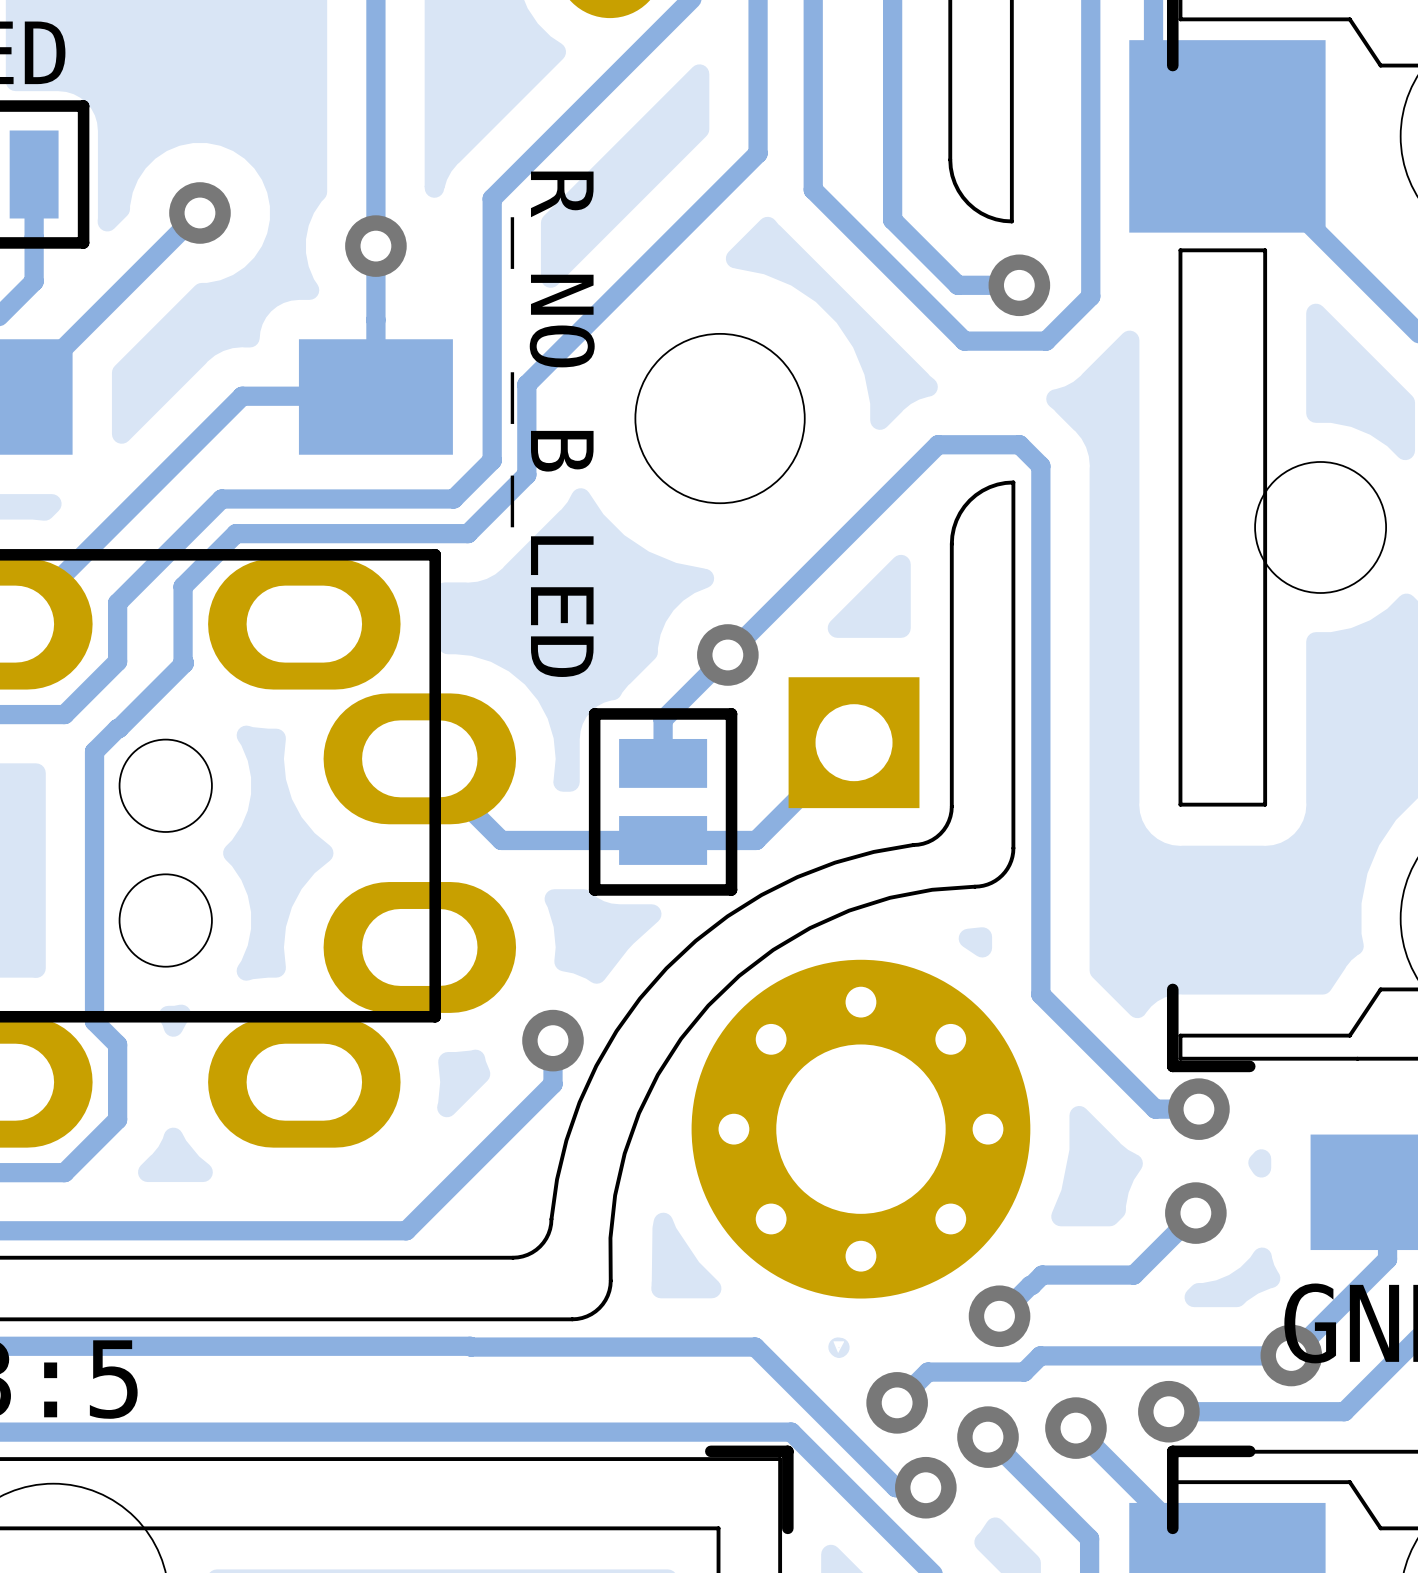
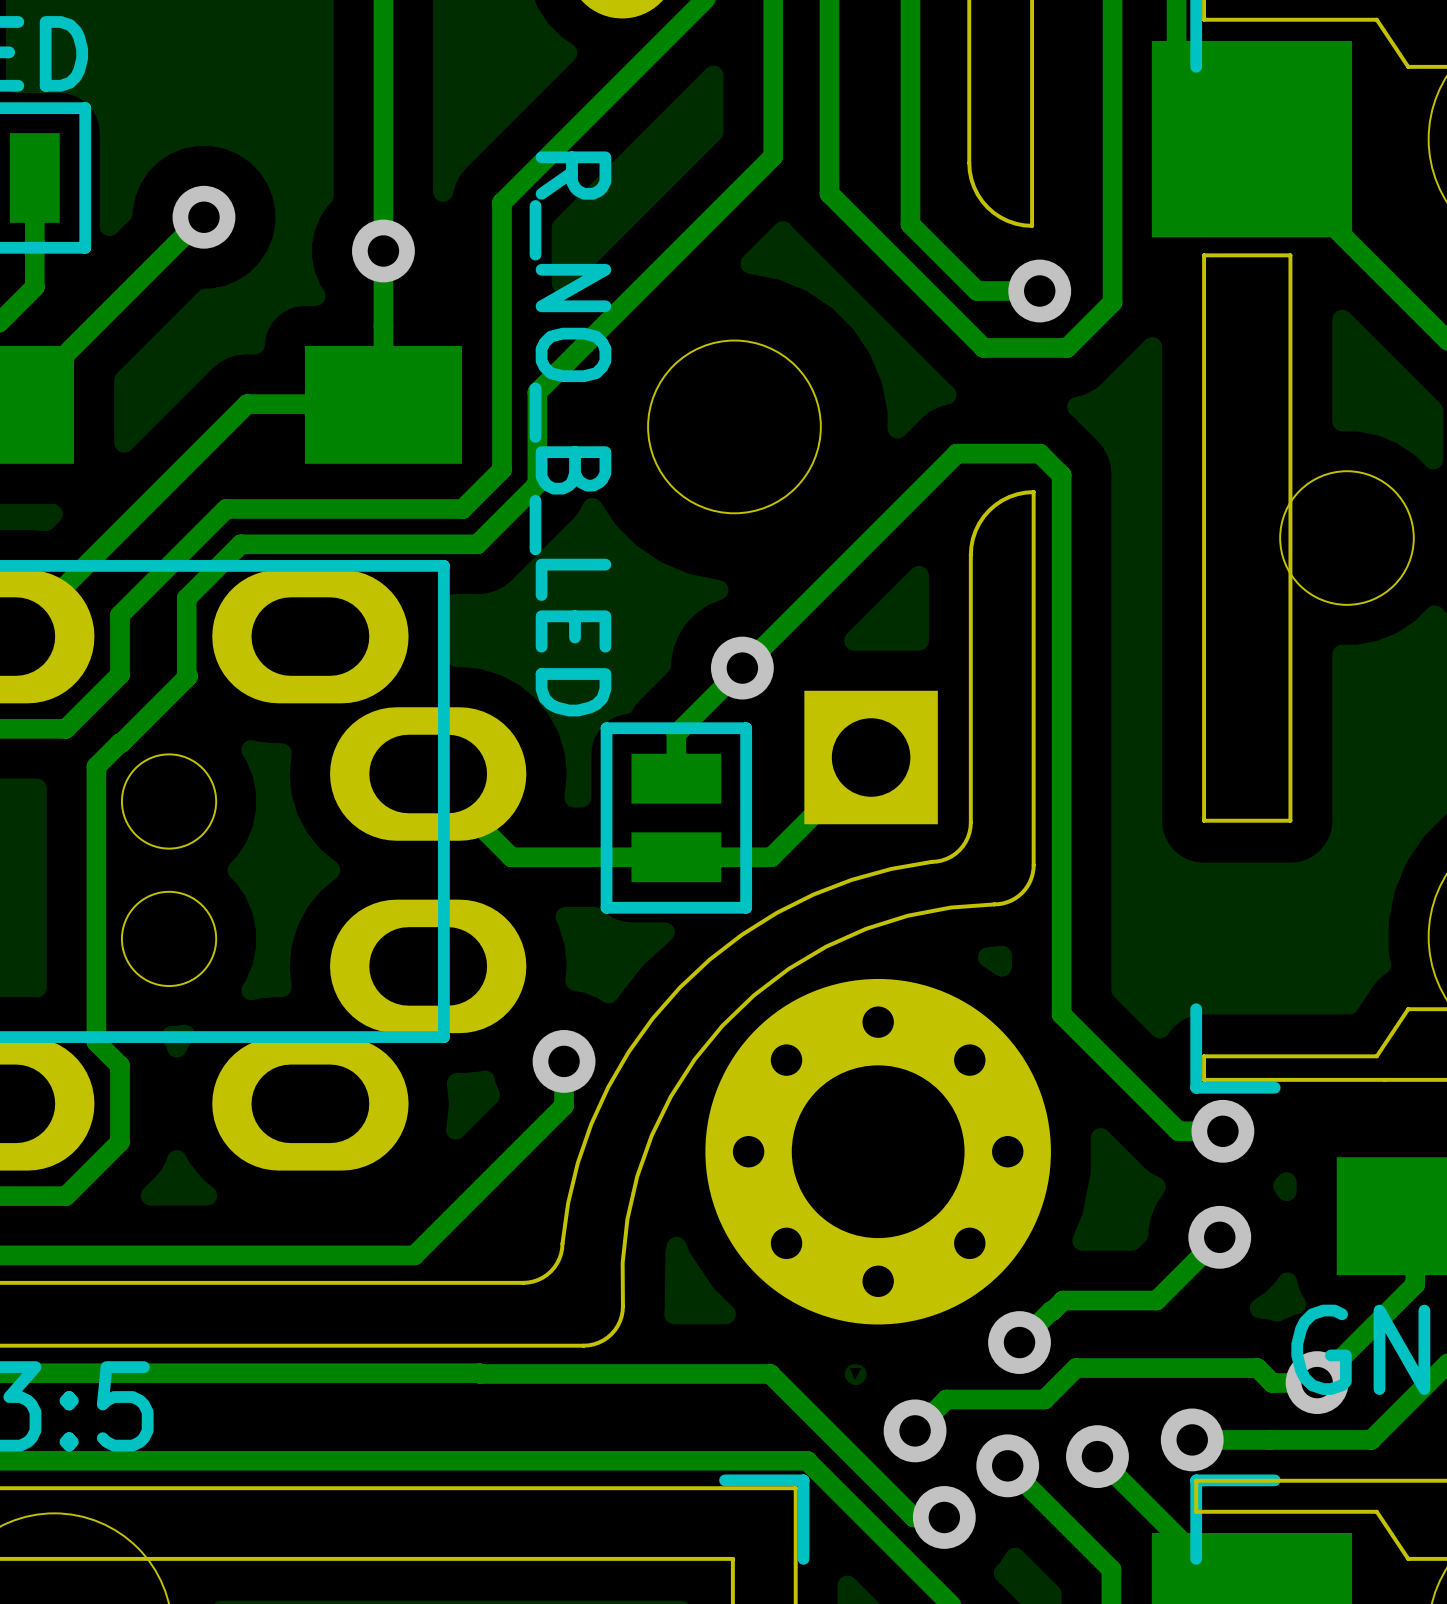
track: (1247, 1355) (1040, 1355) -> (1272, 1382) (1257, 1368) (1076, 1368) (1061, 1382)

